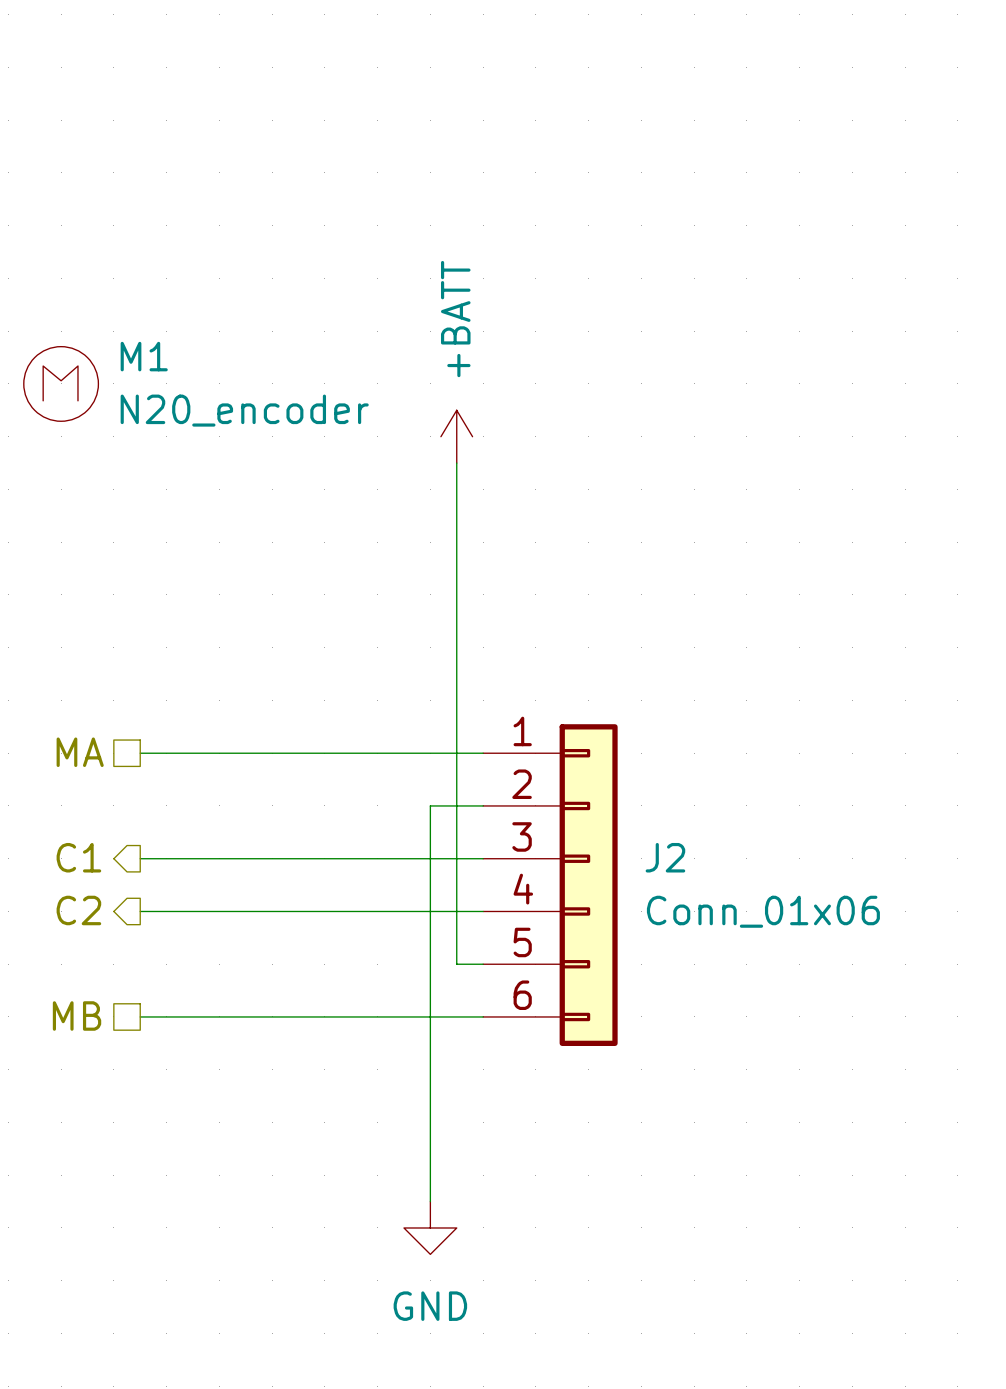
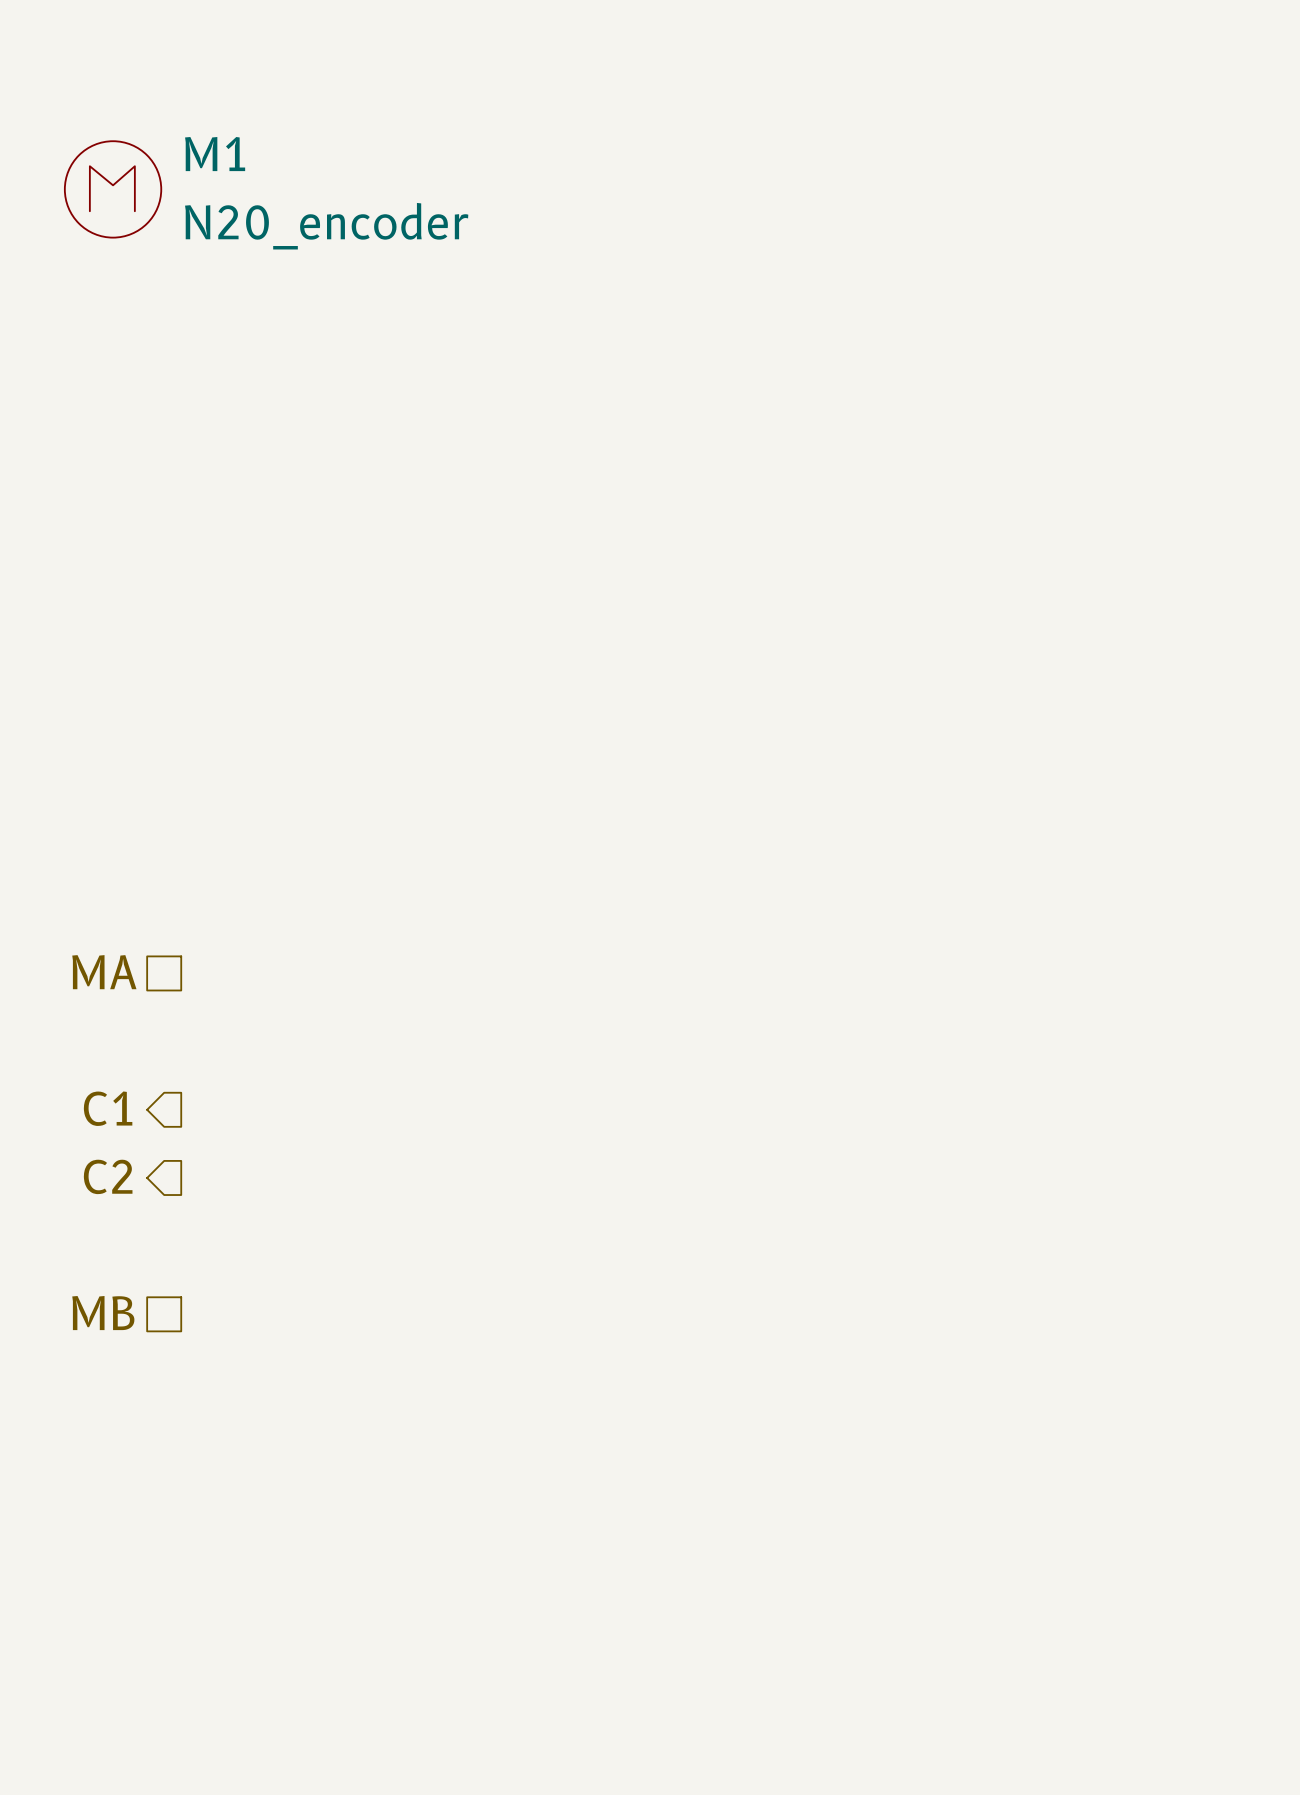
M1 position: (61, 383) -> (113, 189)
power symbol: +BATT (456, 436) -> none
wire: (456, 463) (456, 964) (483, 964) -> none
wire: (140, 753) (483, 753) -> none
wire: (483, 805) (430, 805) (430, 1201) -> none
wire: (140, 858) (483, 858) -> none
J2: Conn_01x06 (550, 885) -> none
wire: (140, 911) (483, 911) -> none
wire: (140, 1016) (483, 1016) -> none
power symbol: GND (430, 1227) -> none

